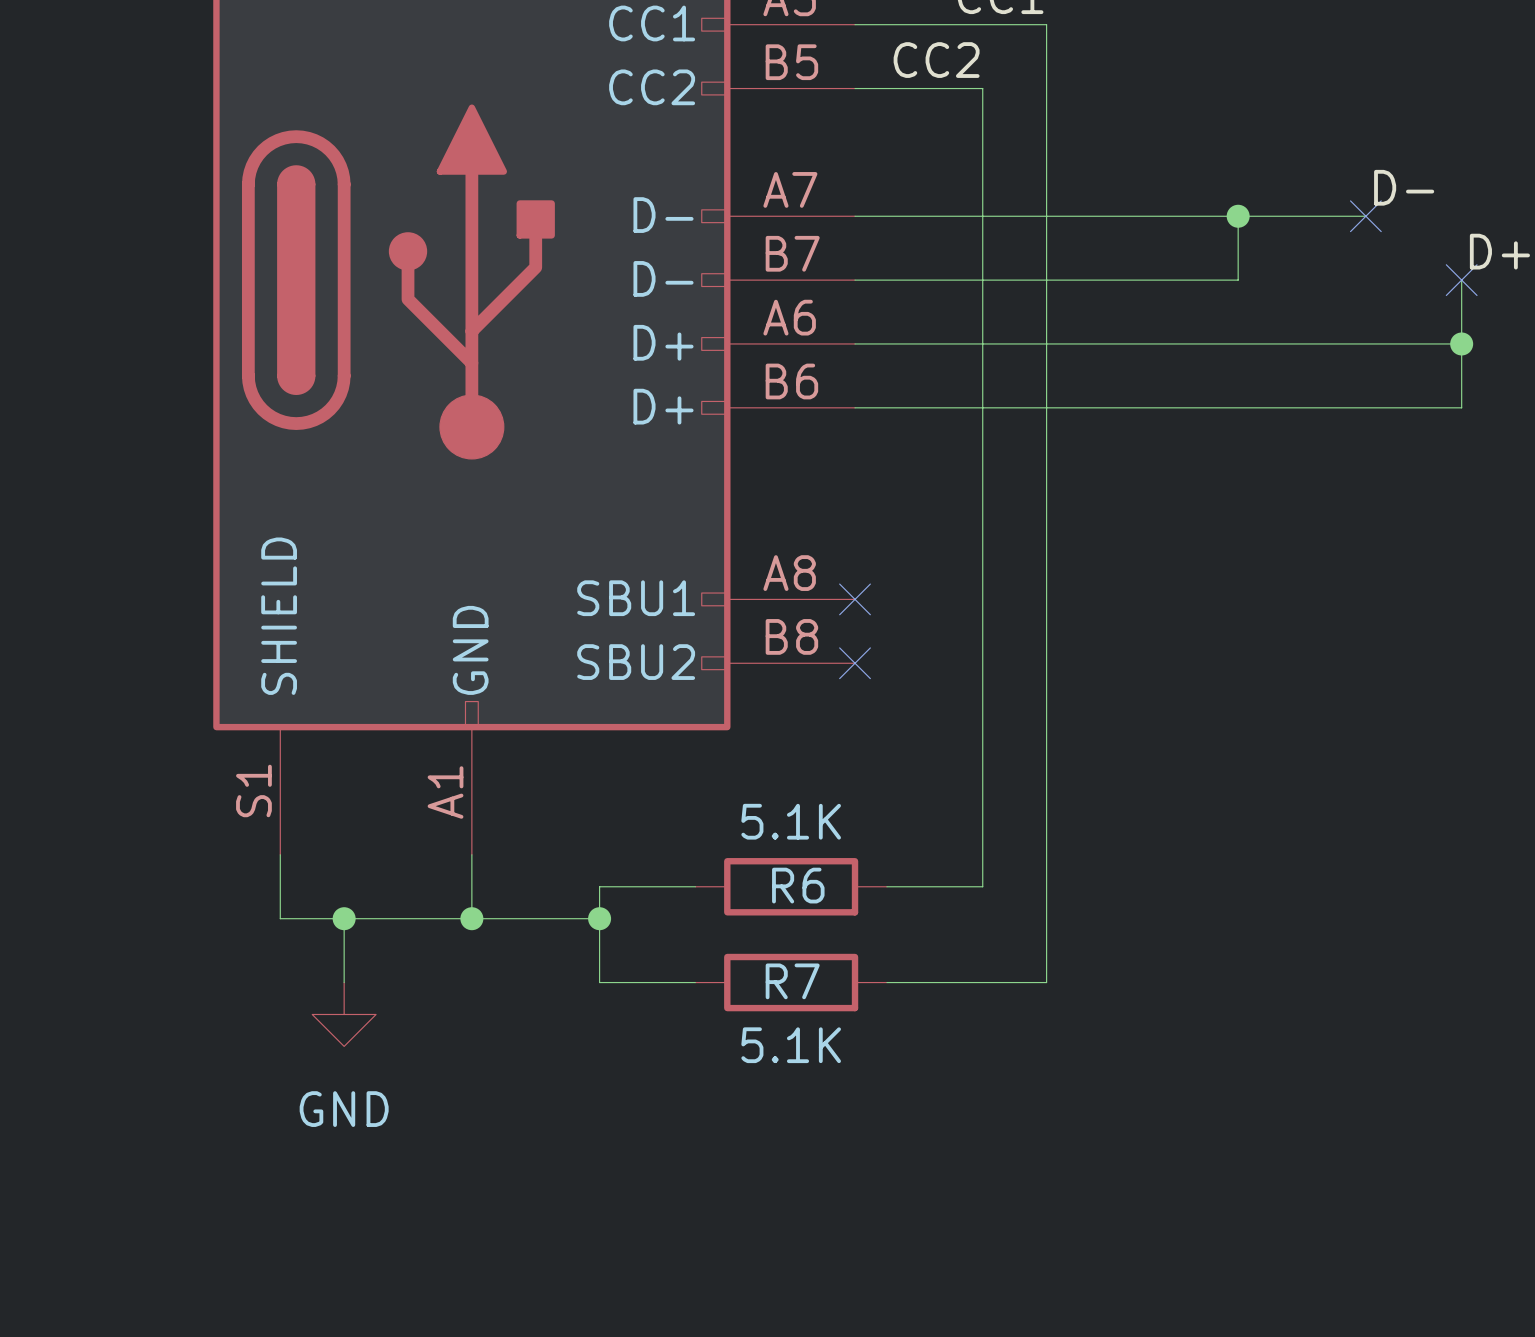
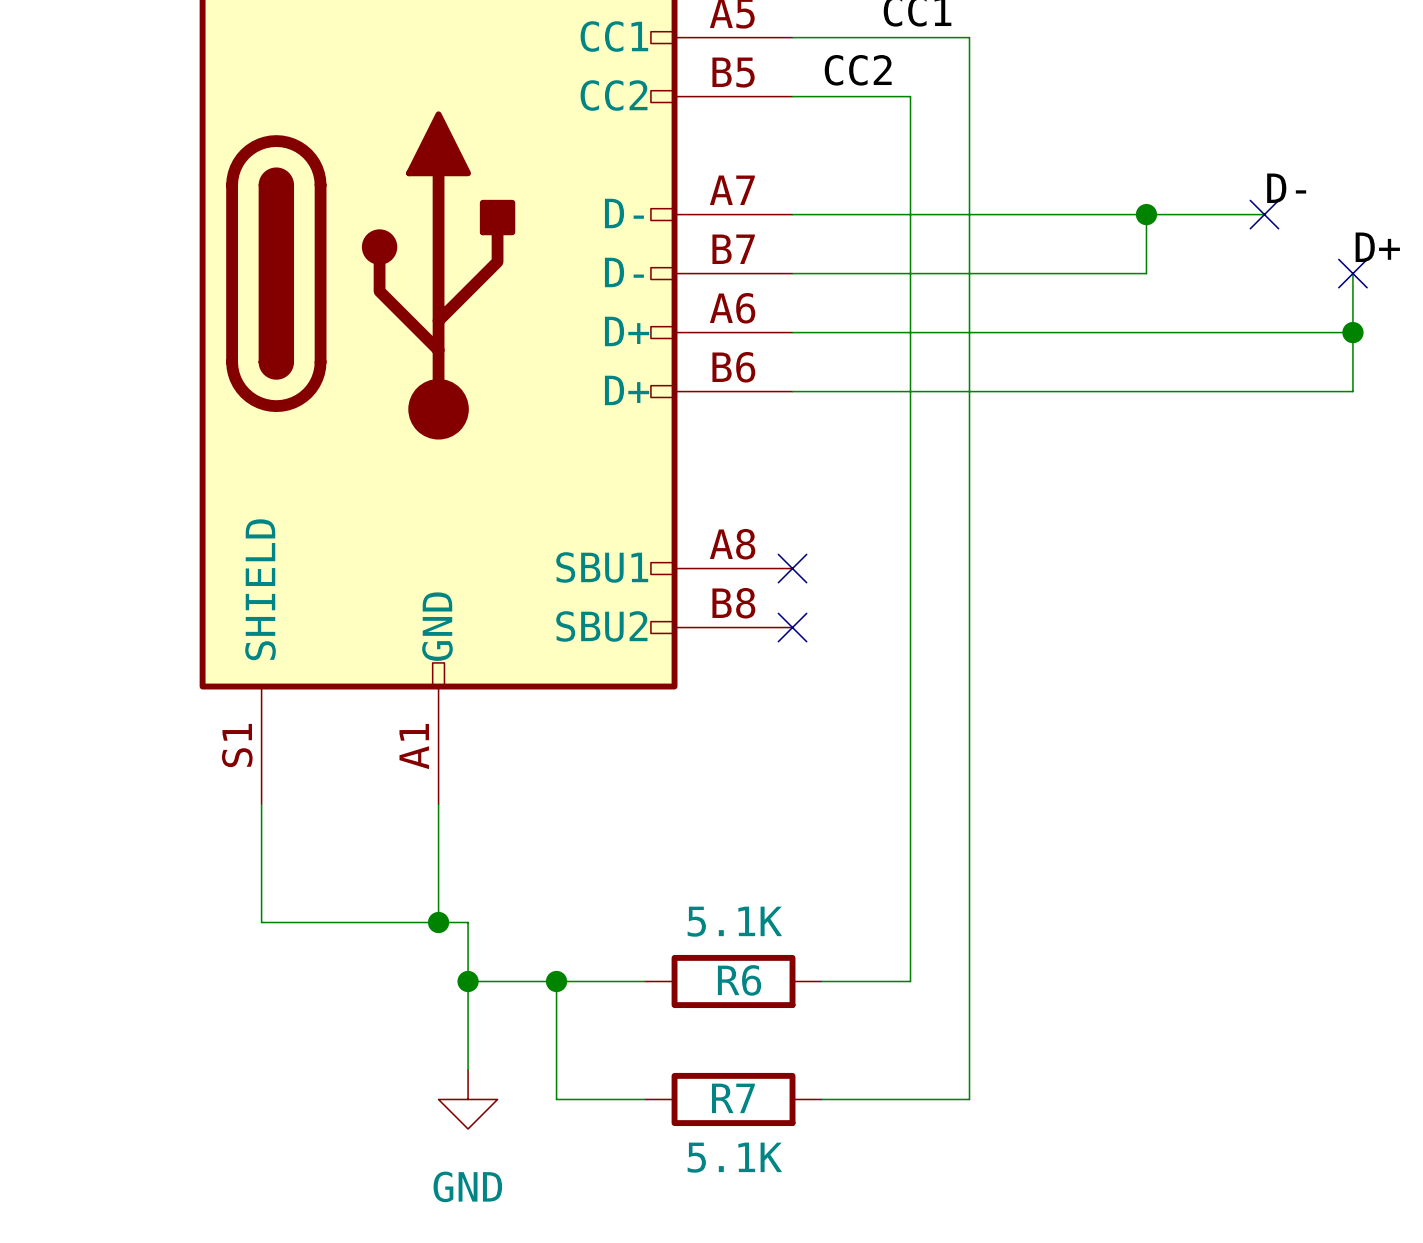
wire: (695, 886) (599, 886) (599, 982) (695, 982) -> none
R6 position: (791, 886) -> (733, 981)
wire: (886, 886) (982, 886) -> (822, 981) (910, 981) (910, 834)
wire: (280, 918) (599, 918) -> (261, 863) (261, 922) (468, 922) (468, 1069)
wire: (344, 918) (344, 982) -> (438, 863) (438, 922)
junction: (344, 918) -> none
junction position: (471, 918) -> (438, 922)
junction: (599, 918) -> none
R7 position: (791, 982) -> (733, 1099)
wire: (886, 982) (1046, 982) -> (822, 1099) (969, 1099) (969, 922)
power symbol position: GND (344, 1014) -> GND (468, 1099)
wire: none -> (468, 981) (645, 981)
junction: none -> (468, 981)
wire: none -> (556, 981) (556, 1099) (645, 1099)
junction: none -> (556, 981)

